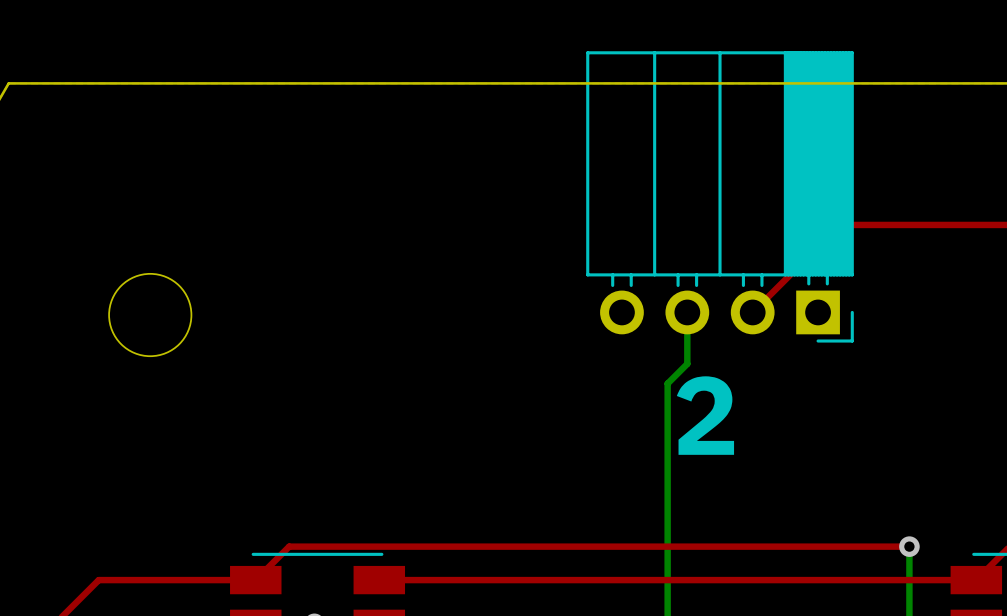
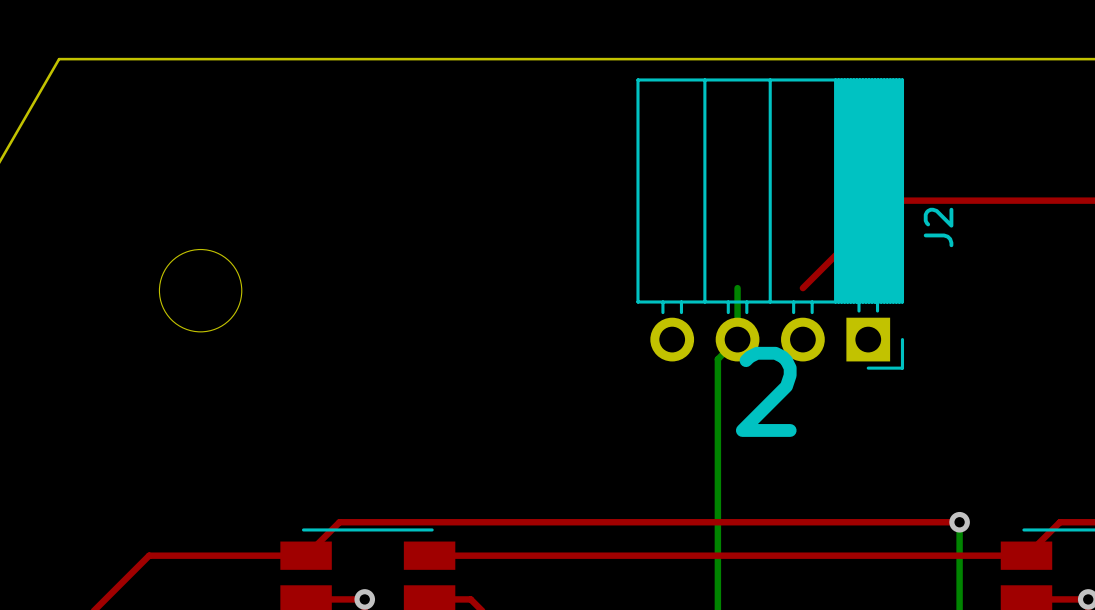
part: (720, 196) -> none
J2: none -> (770, 224)

